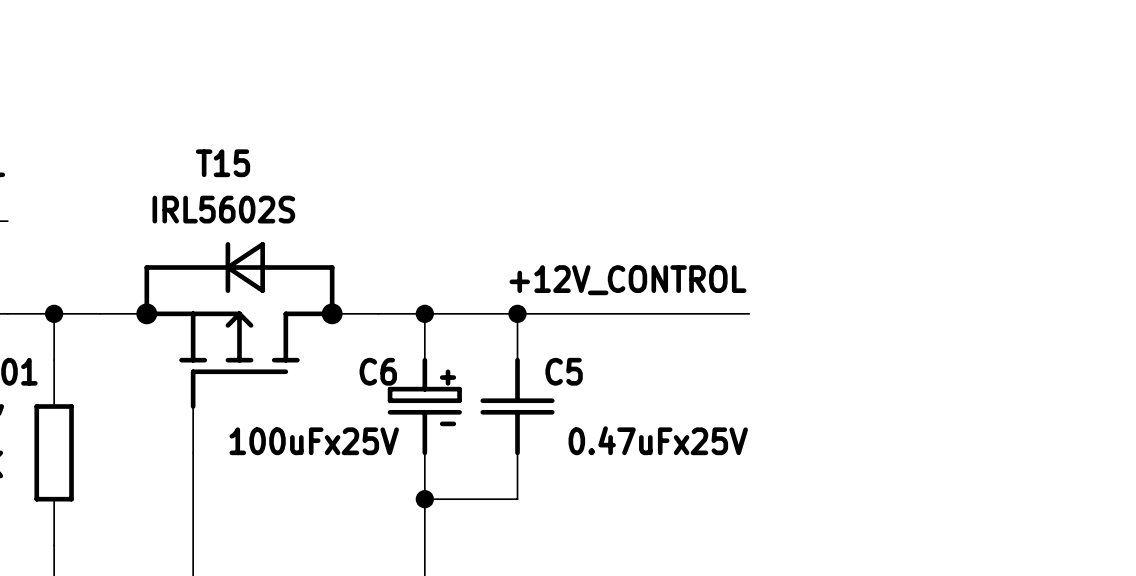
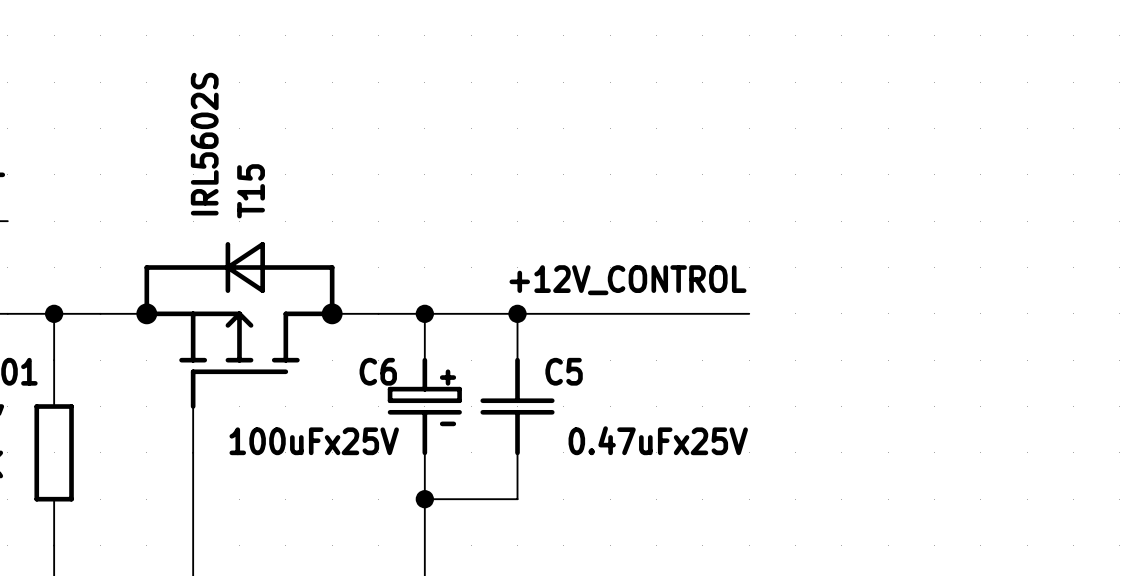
T15 name rotation: 0° (223, 163) -> 90° counterclockwise (251, 191)
T15 value rotation: 0° (223, 209) -> 90° counterclockwise (204, 144)

